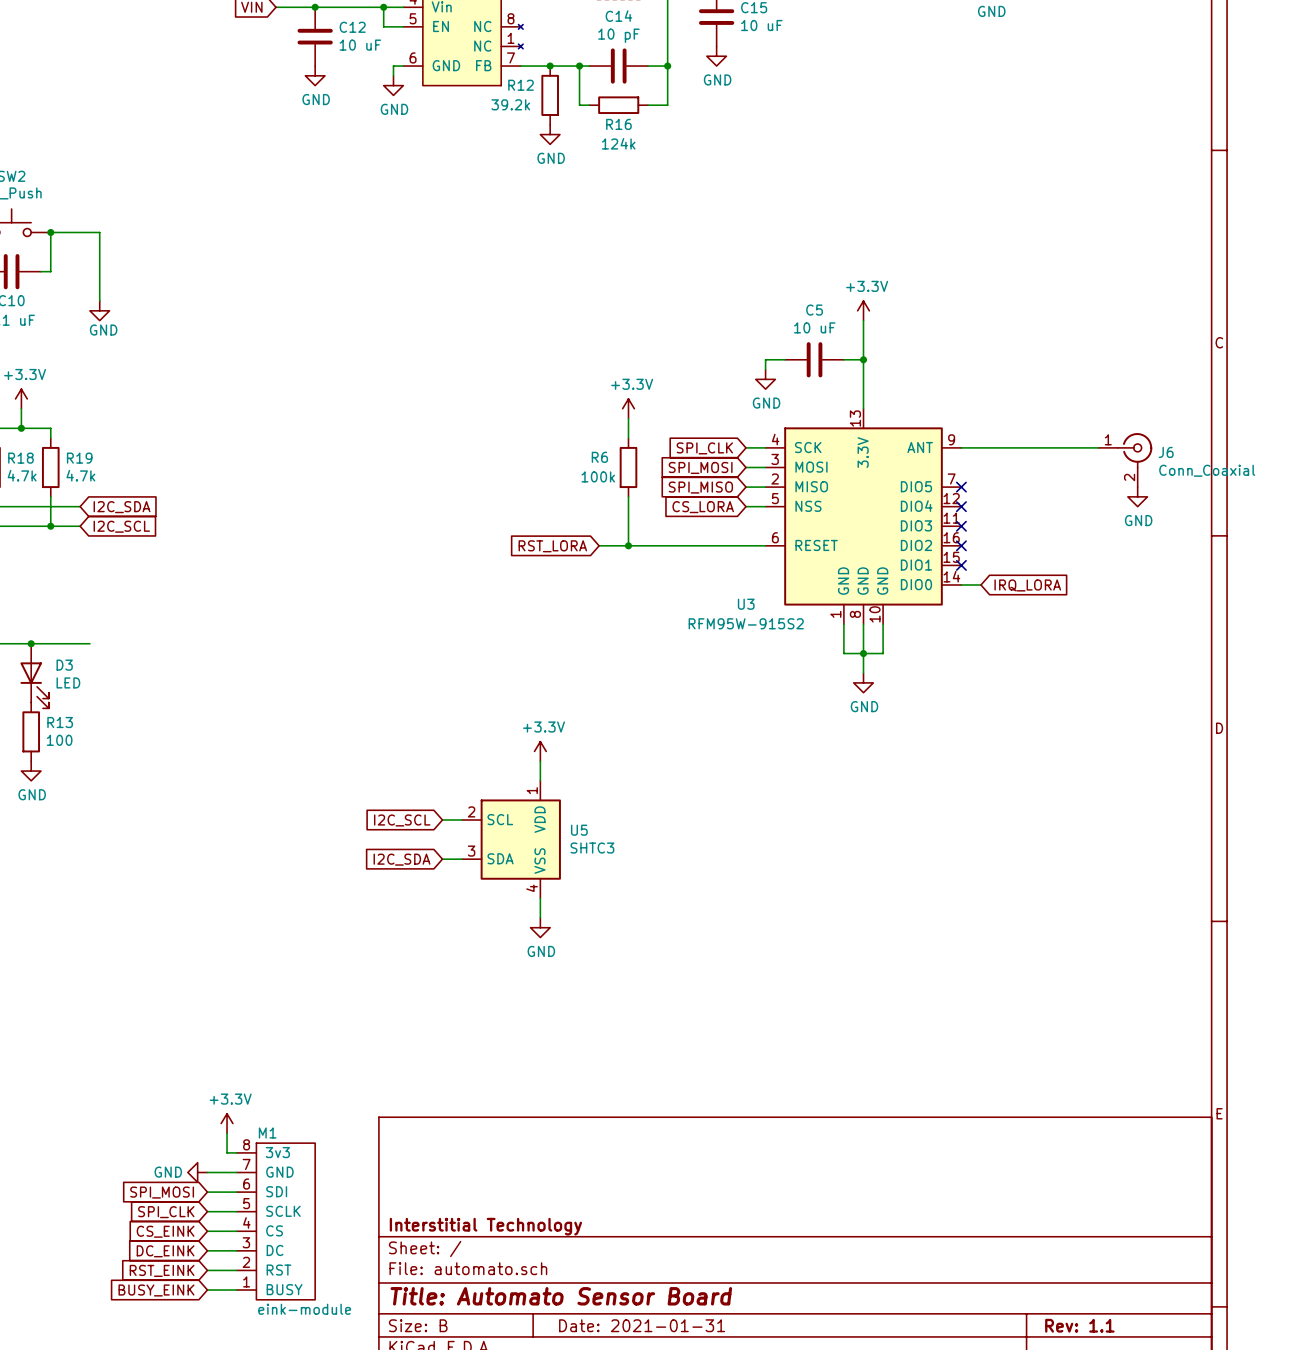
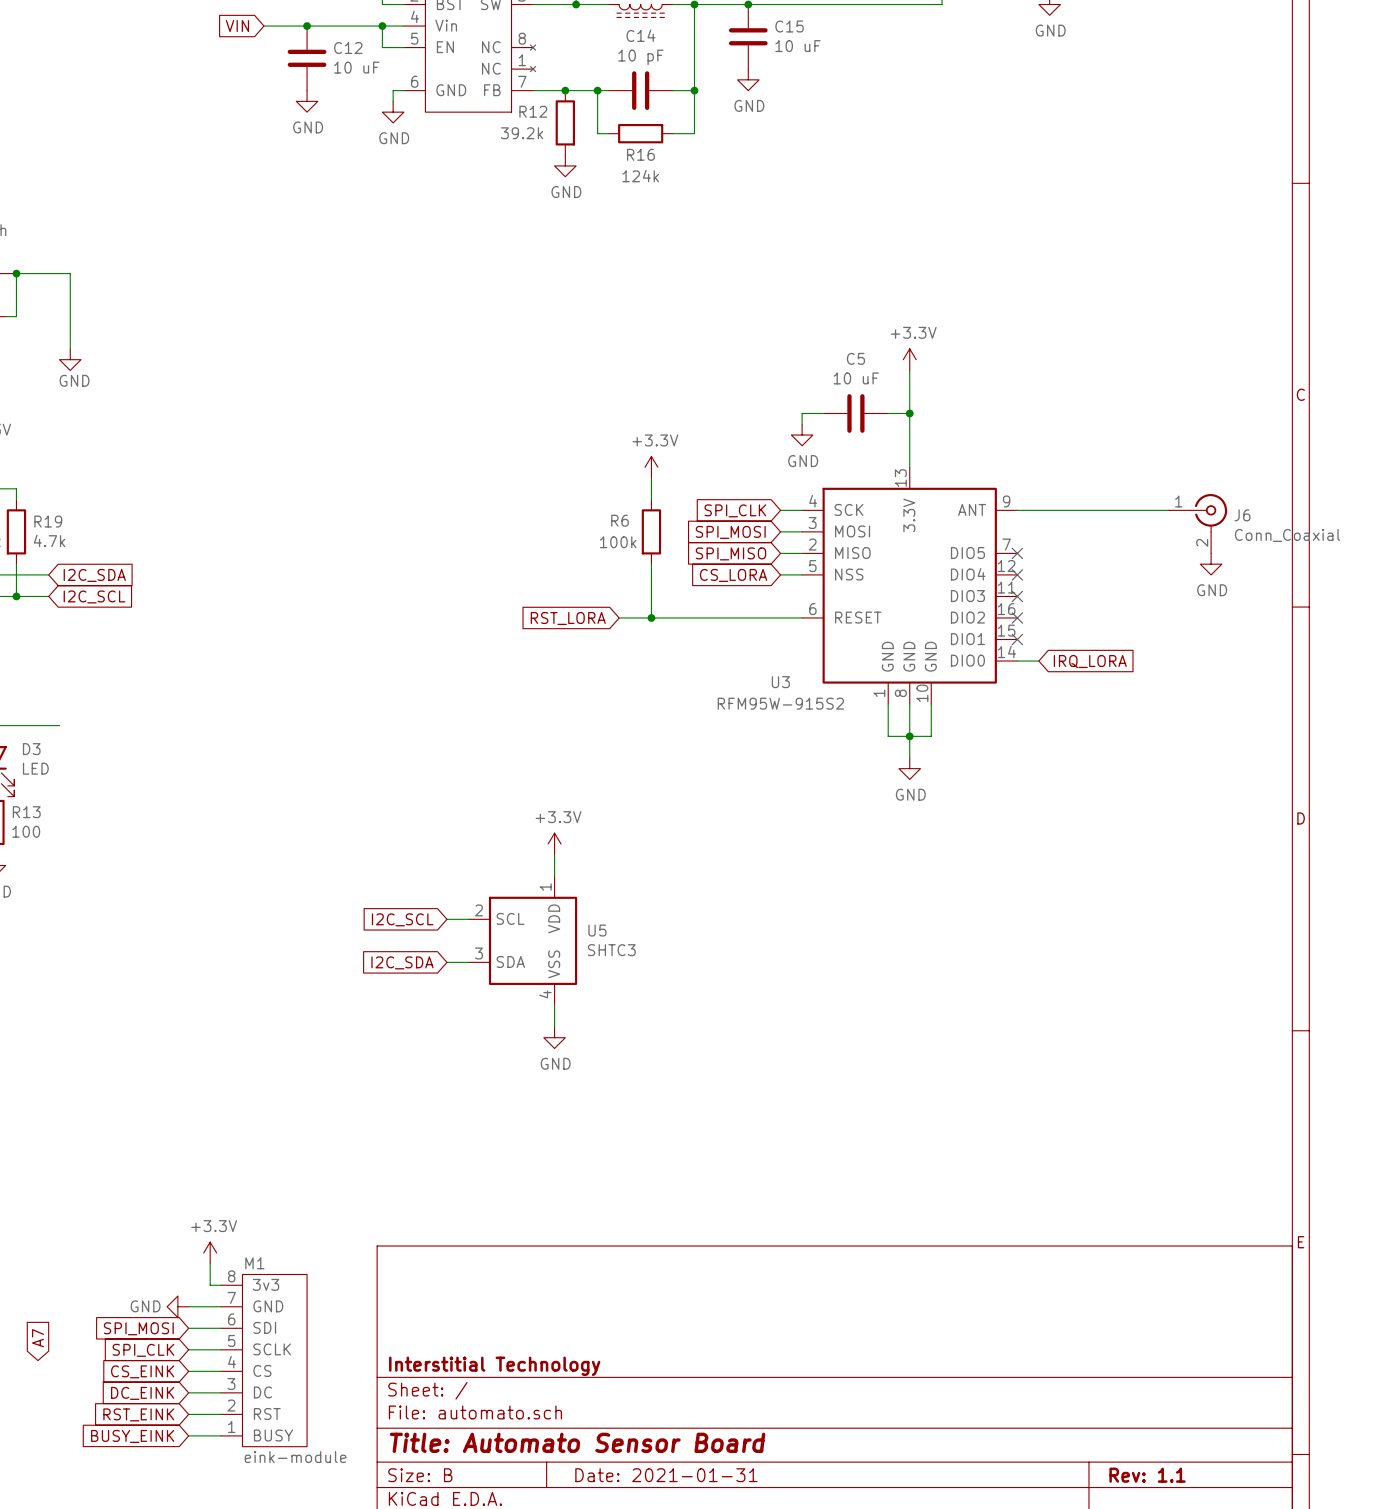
global label: none -> A7 (37, 1338)

